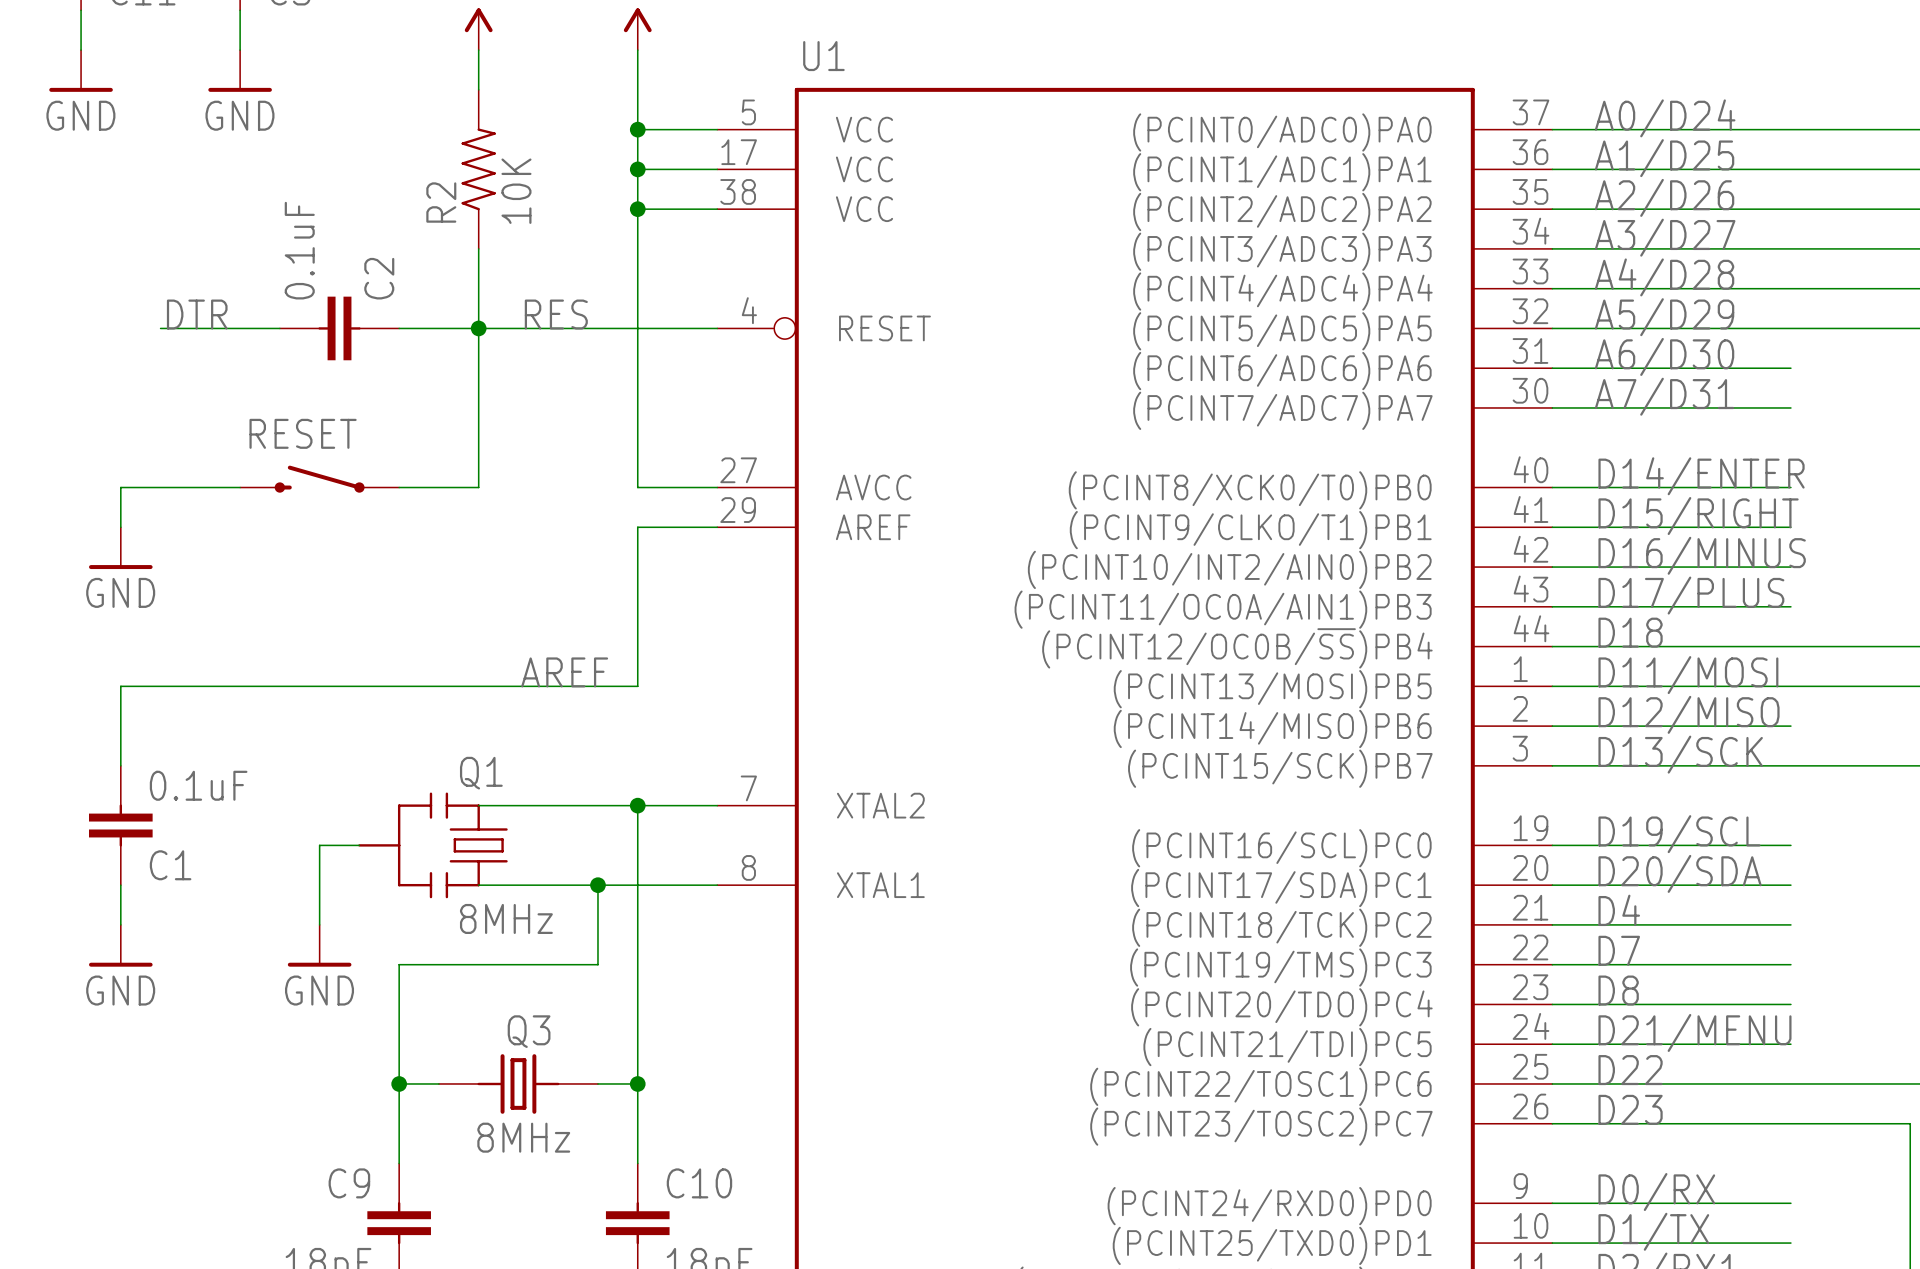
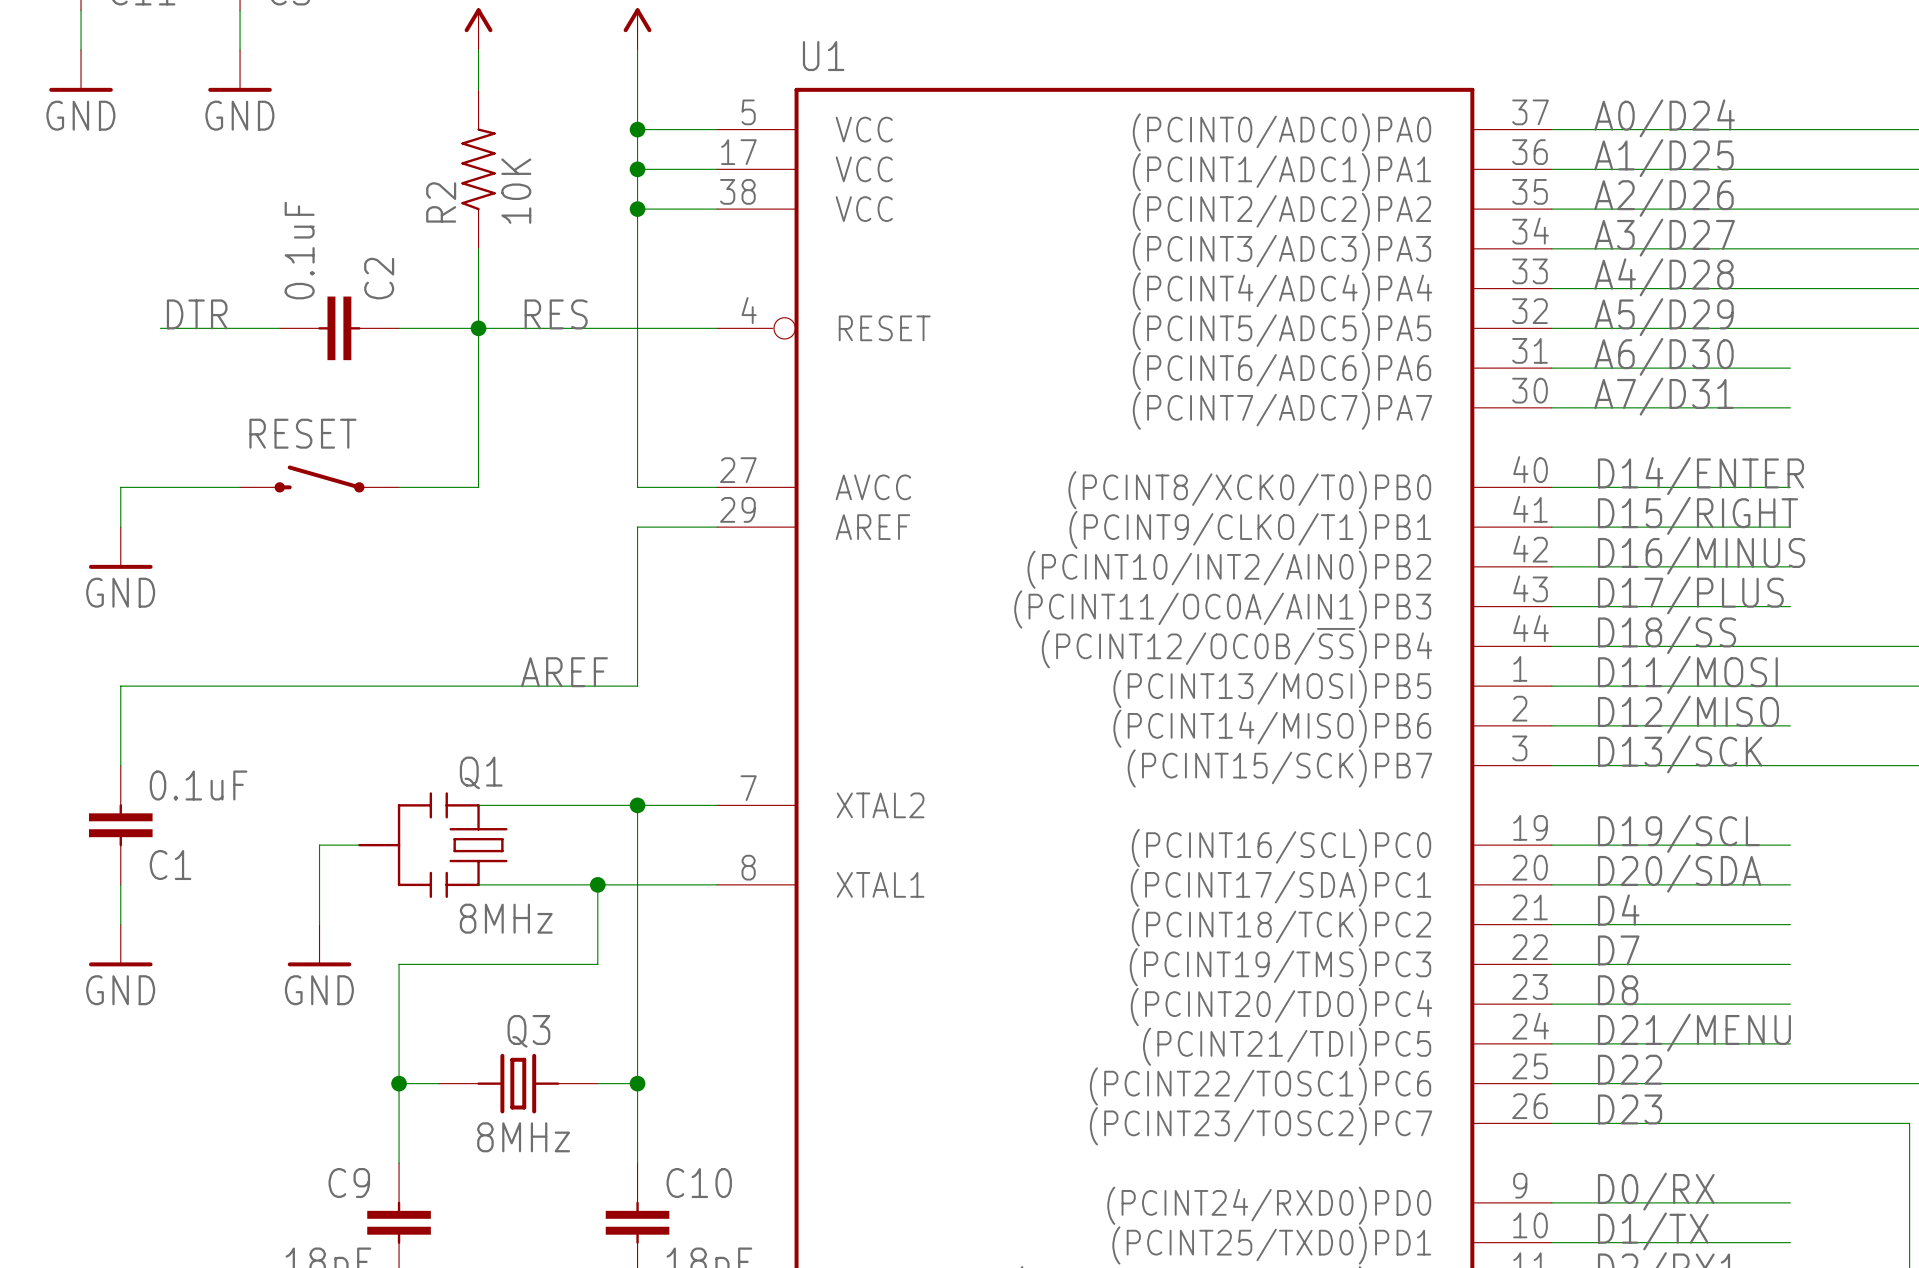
label: D18 (1630, 632) -> D18/SS (1667, 635)

